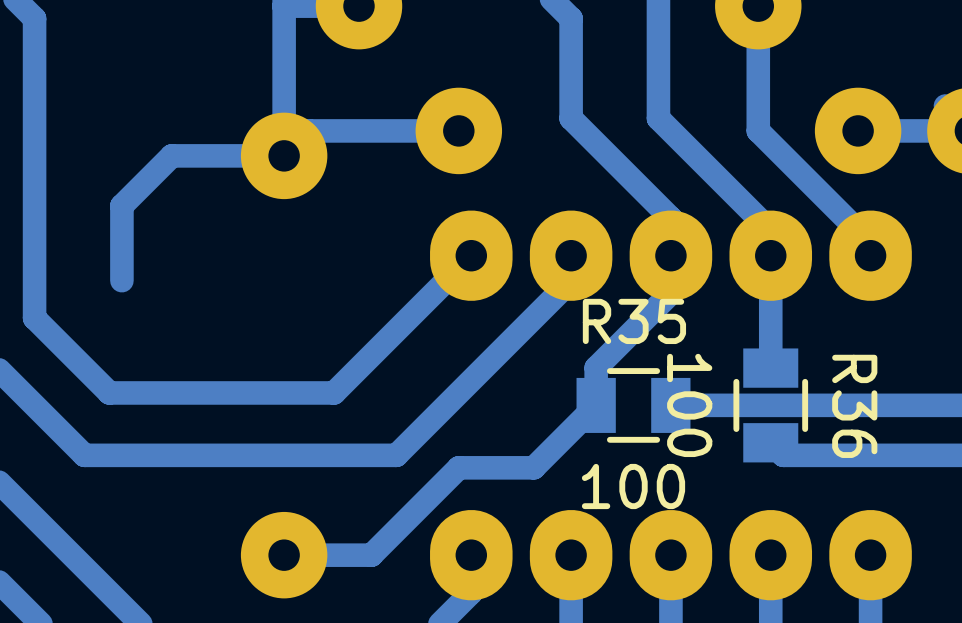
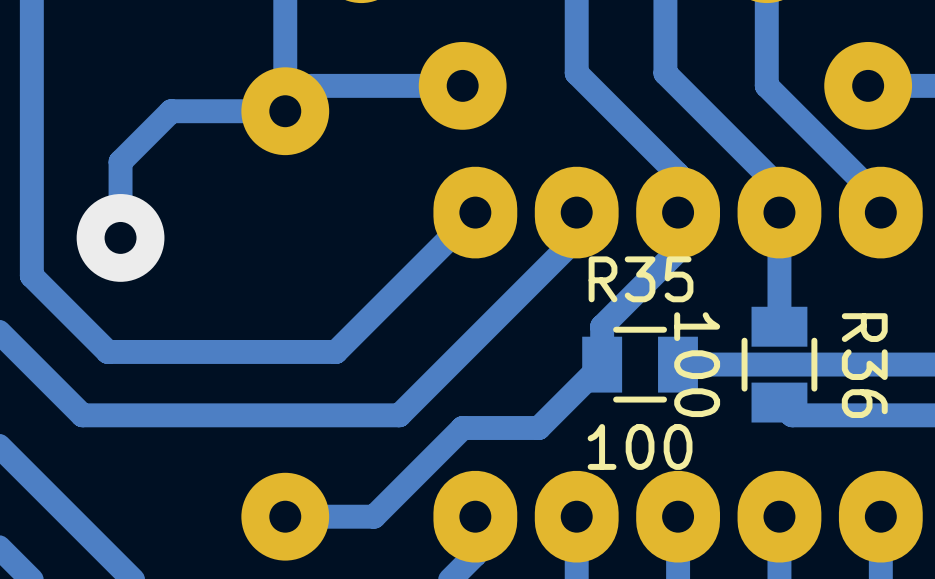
via: none -> (120, 237)

